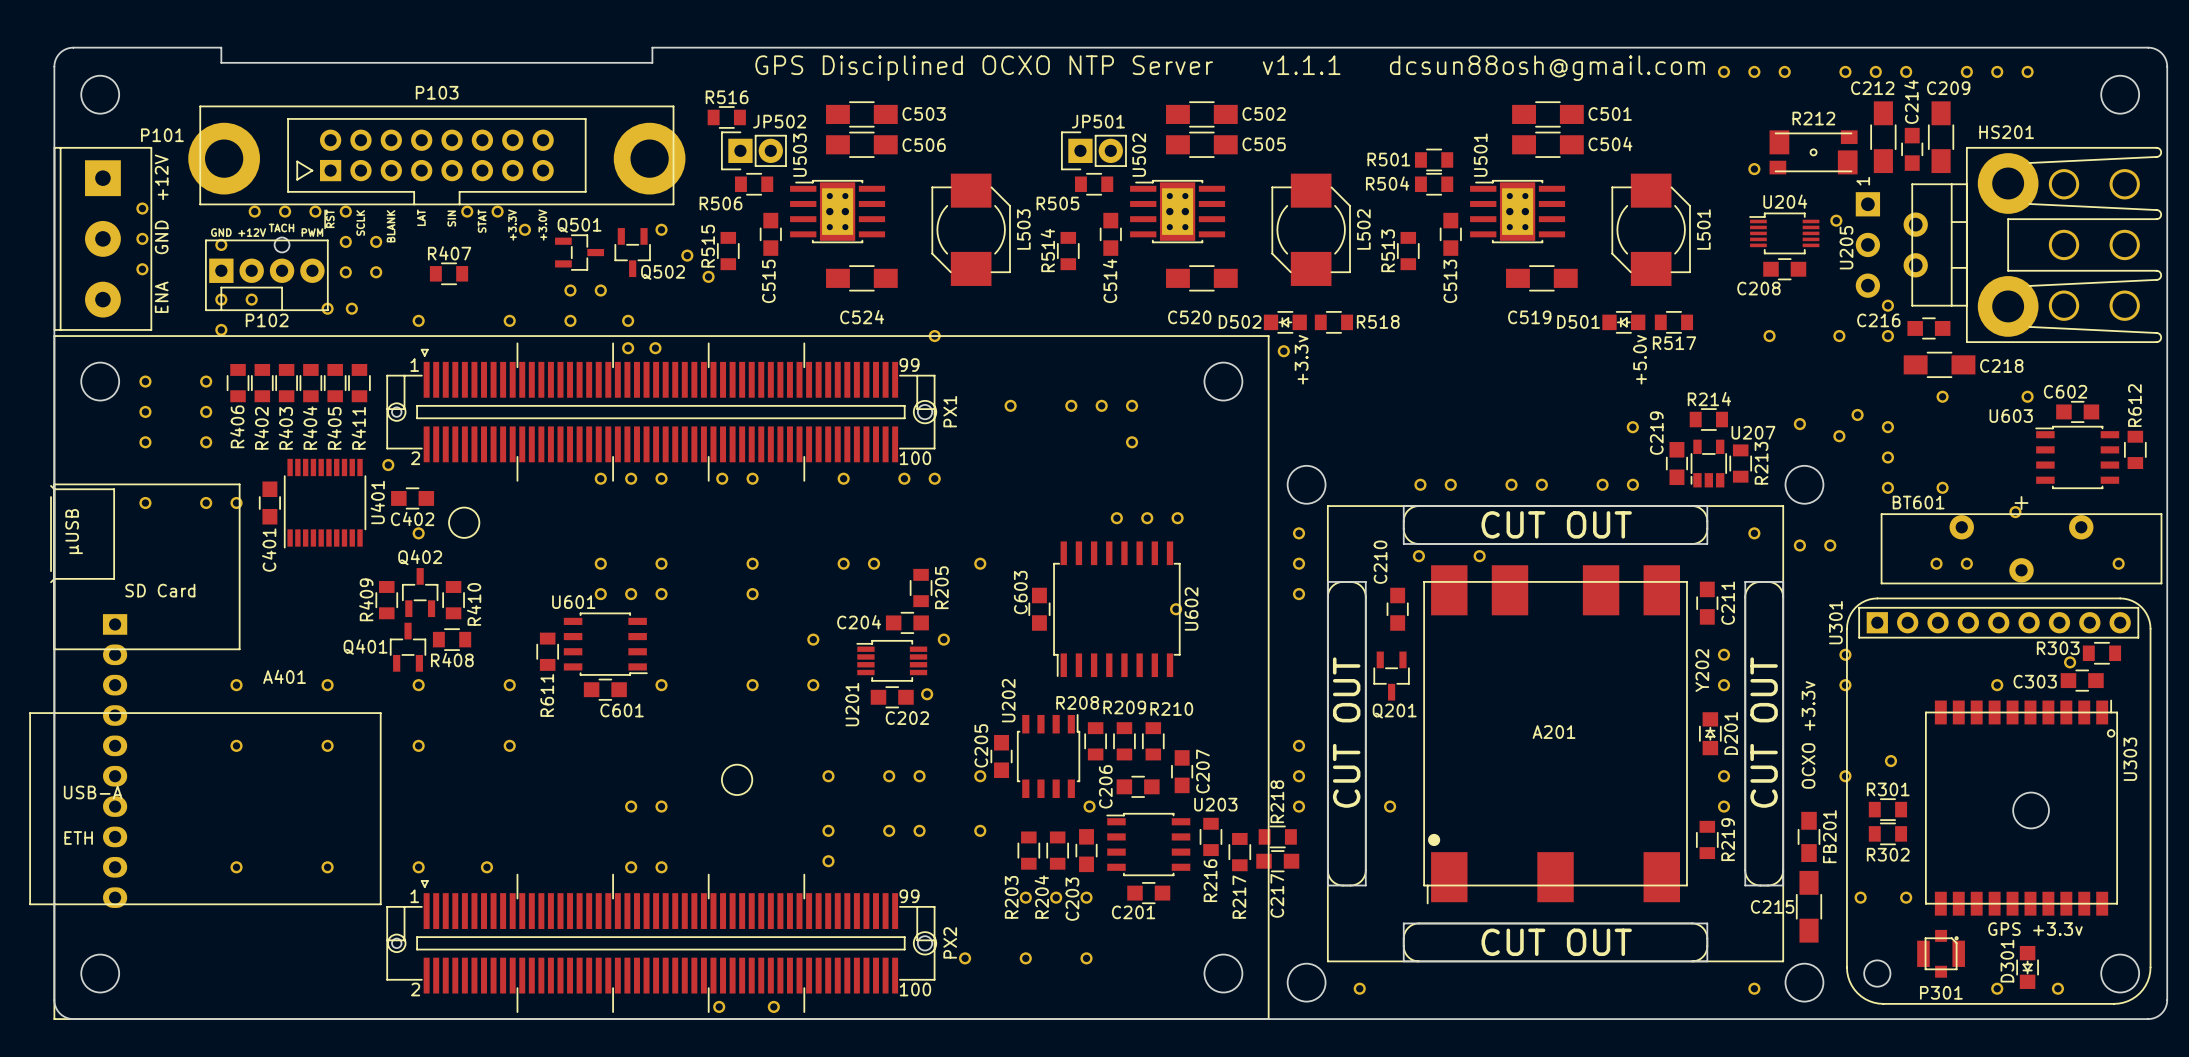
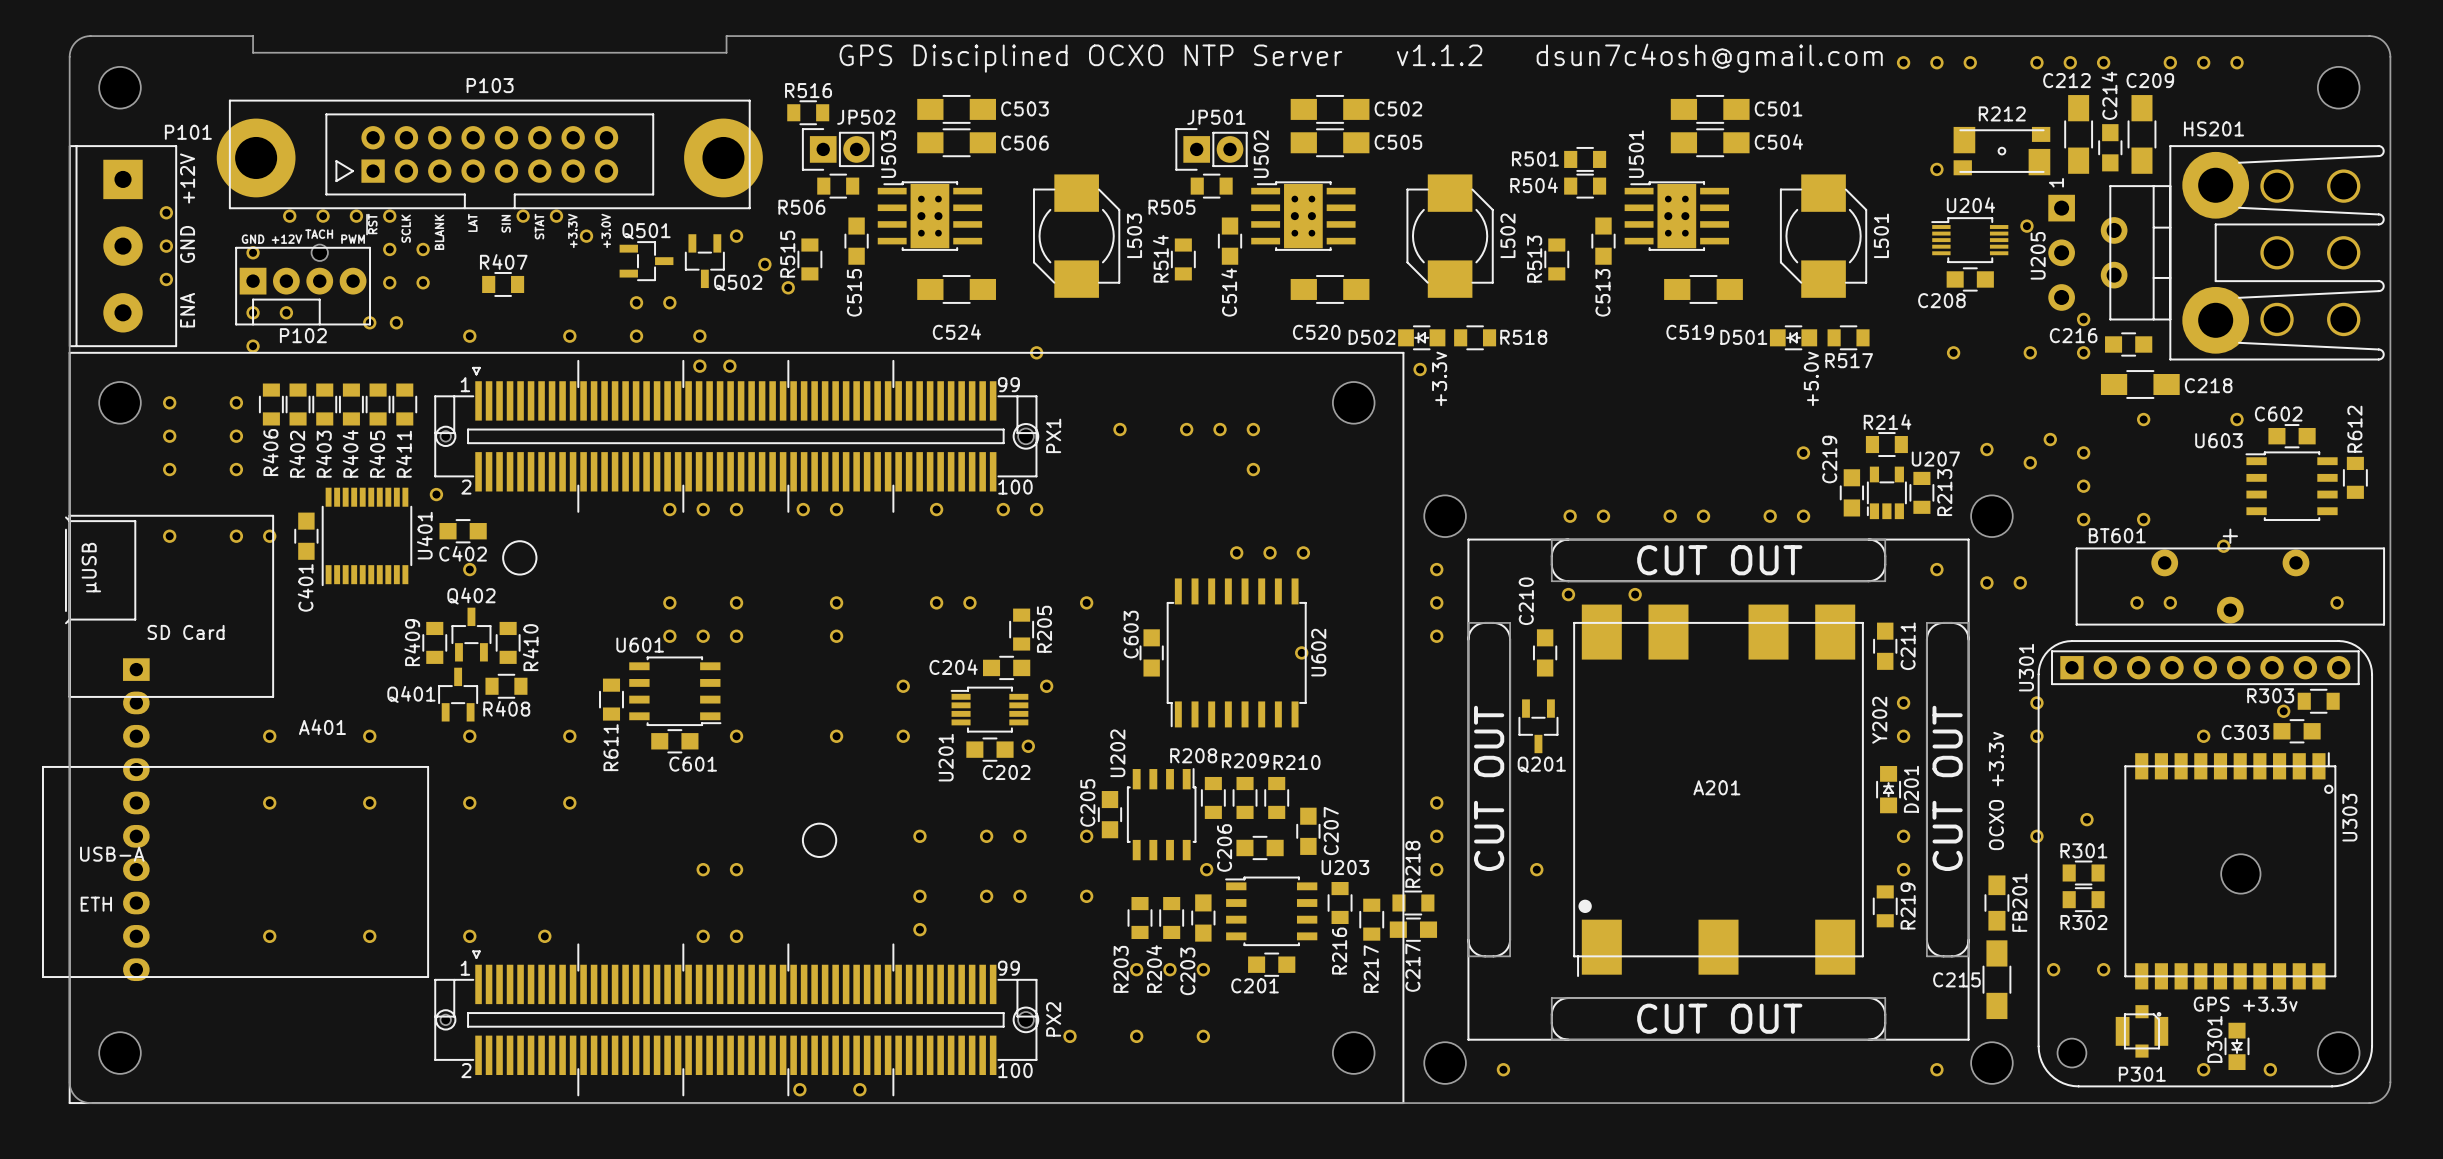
text: v1.1.1 (1301, 65) -> v1.1.2 (1439, 55)
text: dcsun88osh@gmail.com (1547, 68) -> dsun7c4osh@gmail.com (1709, 58)

